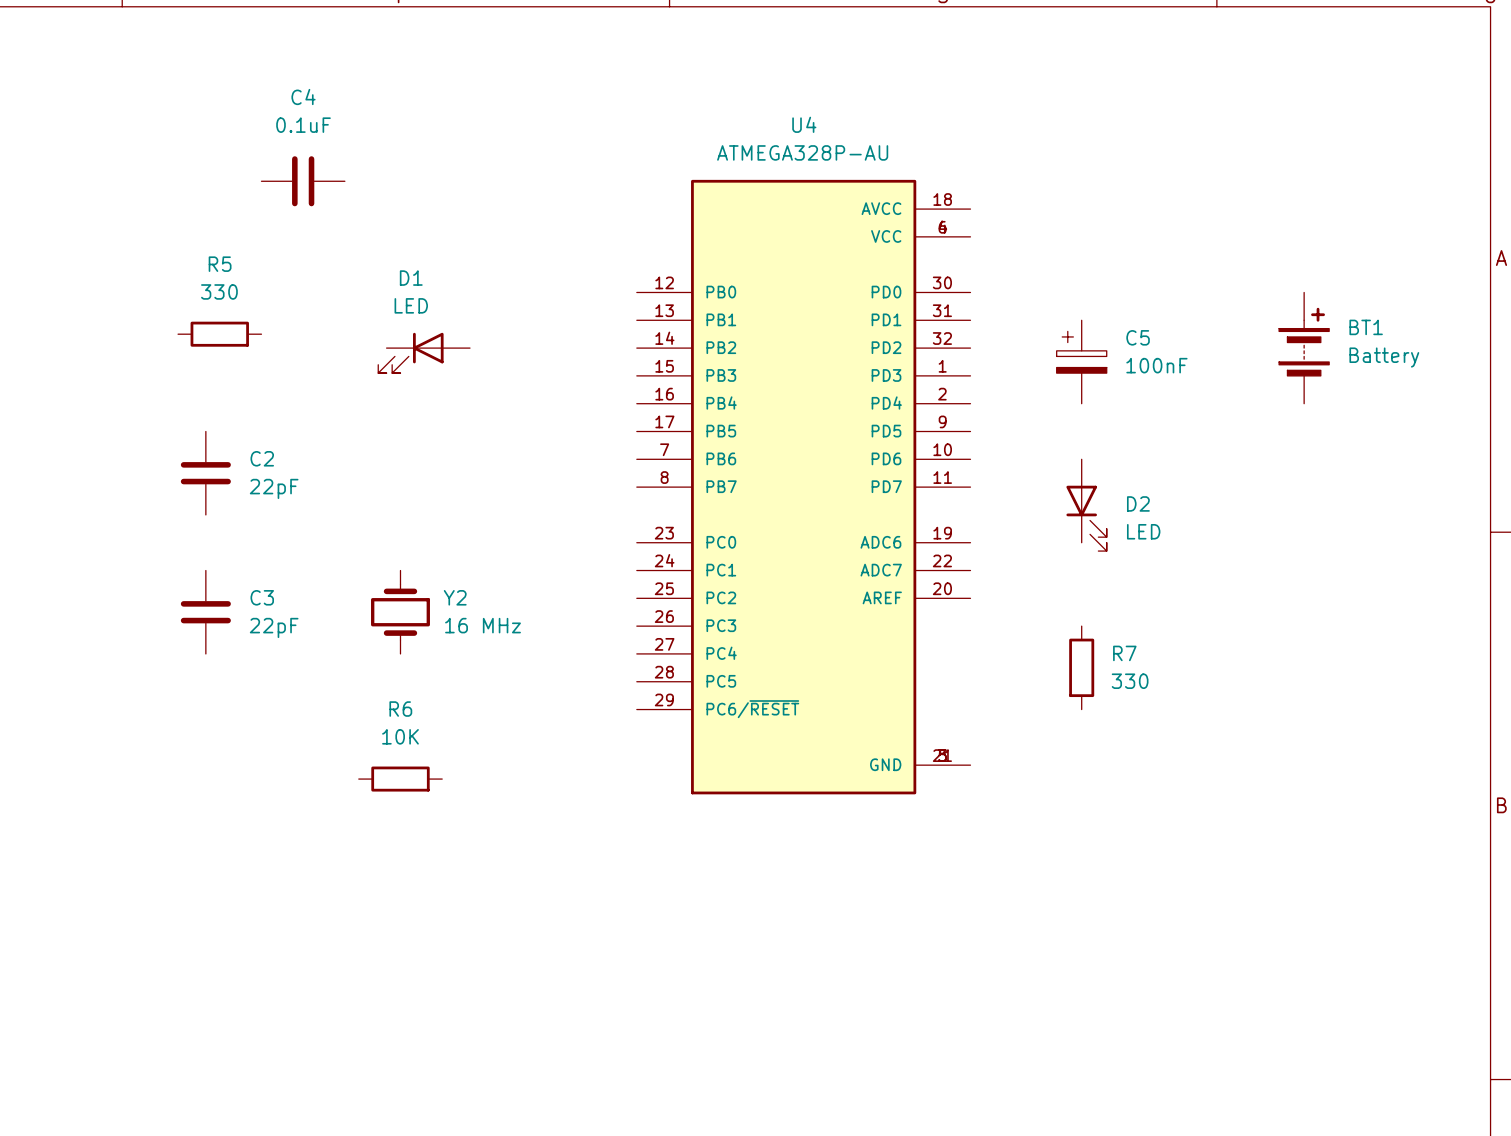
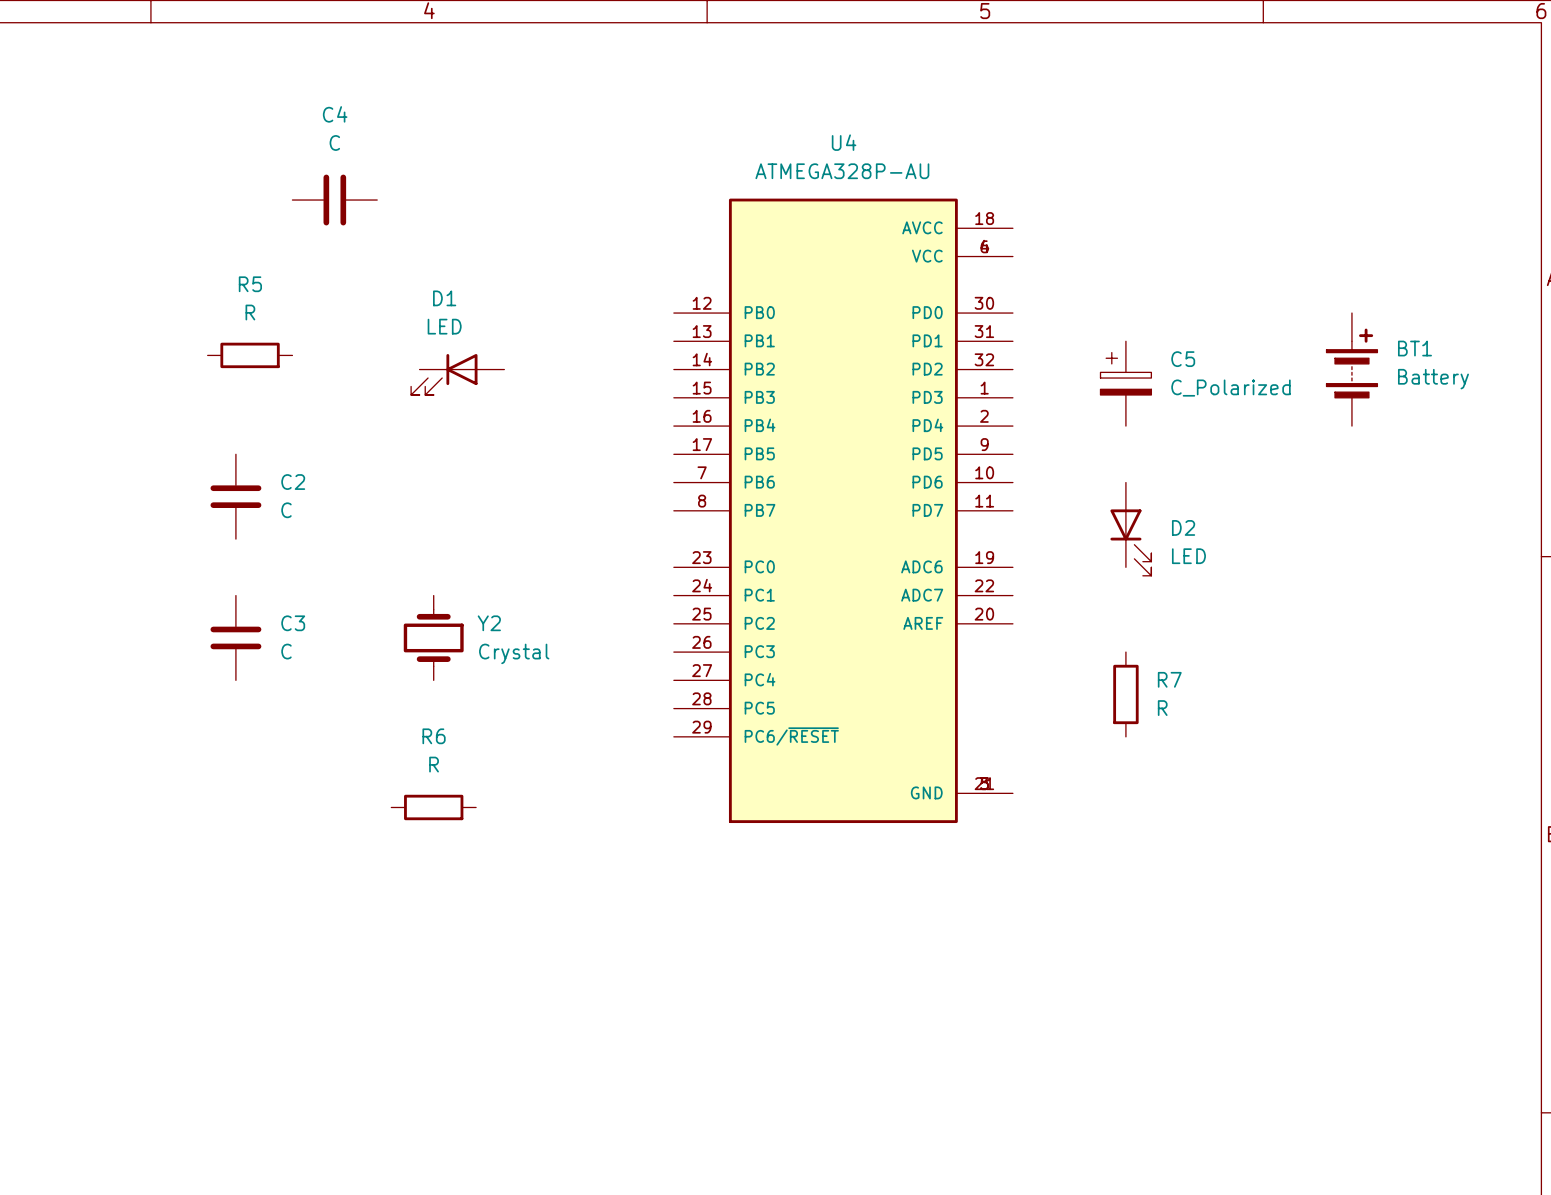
C4 value: 0.1uF (303, 125) -> C (334, 142)
R5 value: 330 (219, 291) -> R (250, 312)
C5 value: 100nF (1156, 365) -> C_Polarized (1230, 388)
C2 value: 22pF (274, 488) -> C (286, 510)
Y2 value: 16 MHz (483, 625) -> Crystal (514, 653)
C3 value: 22pF (274, 627) -> C (286, 651)
R7 value: 330 (1130, 681) -> R (1162, 708)
R6 value: 10K (400, 736) -> R (434, 764)

